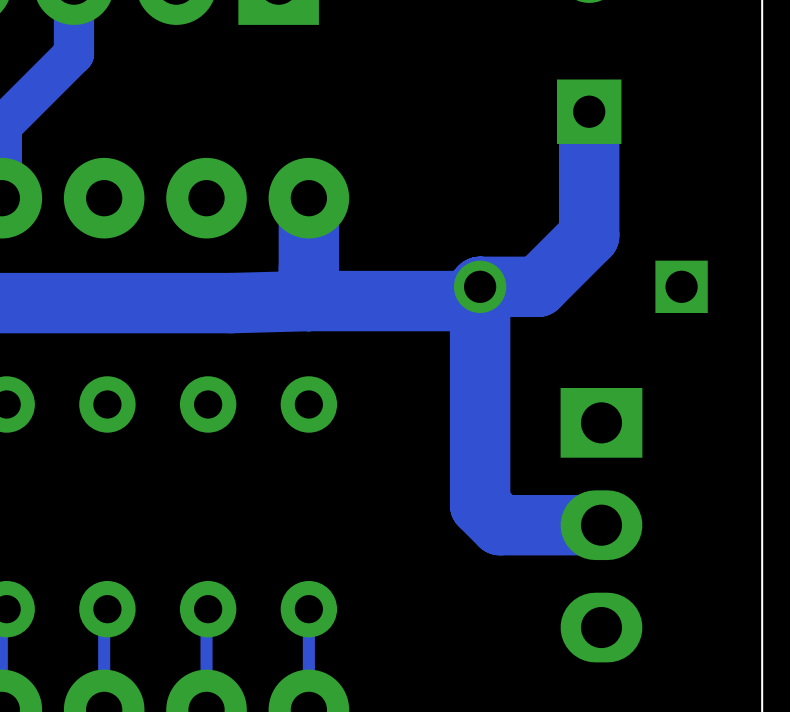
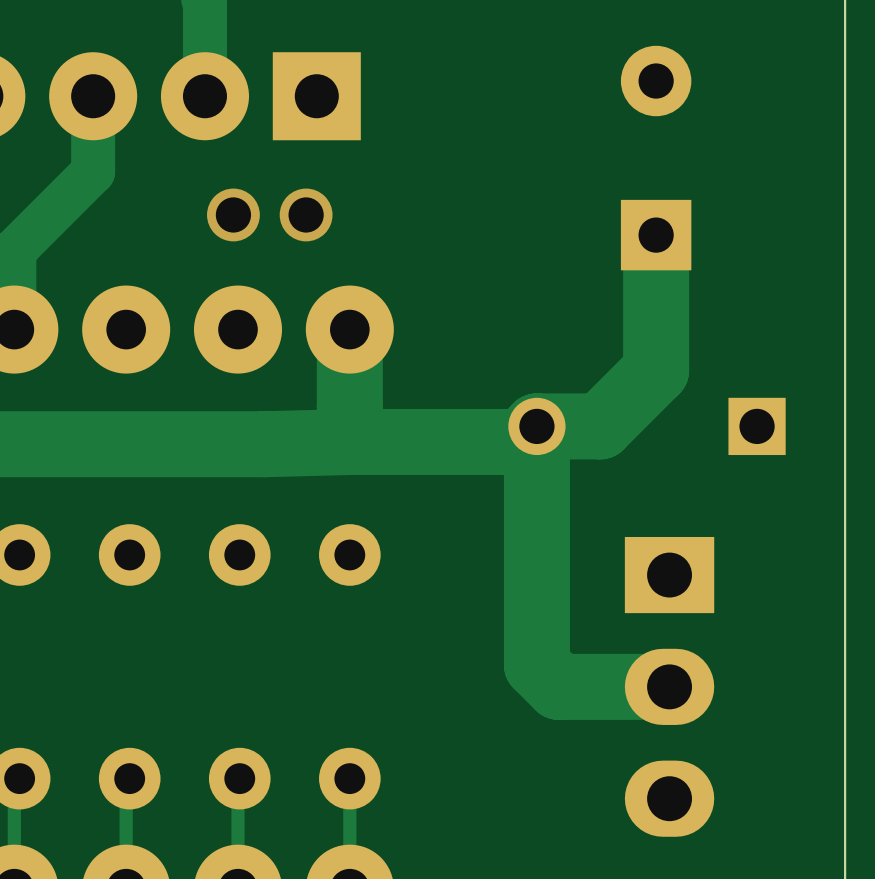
via: none -> (233, 214)
via: none -> (306, 214)

